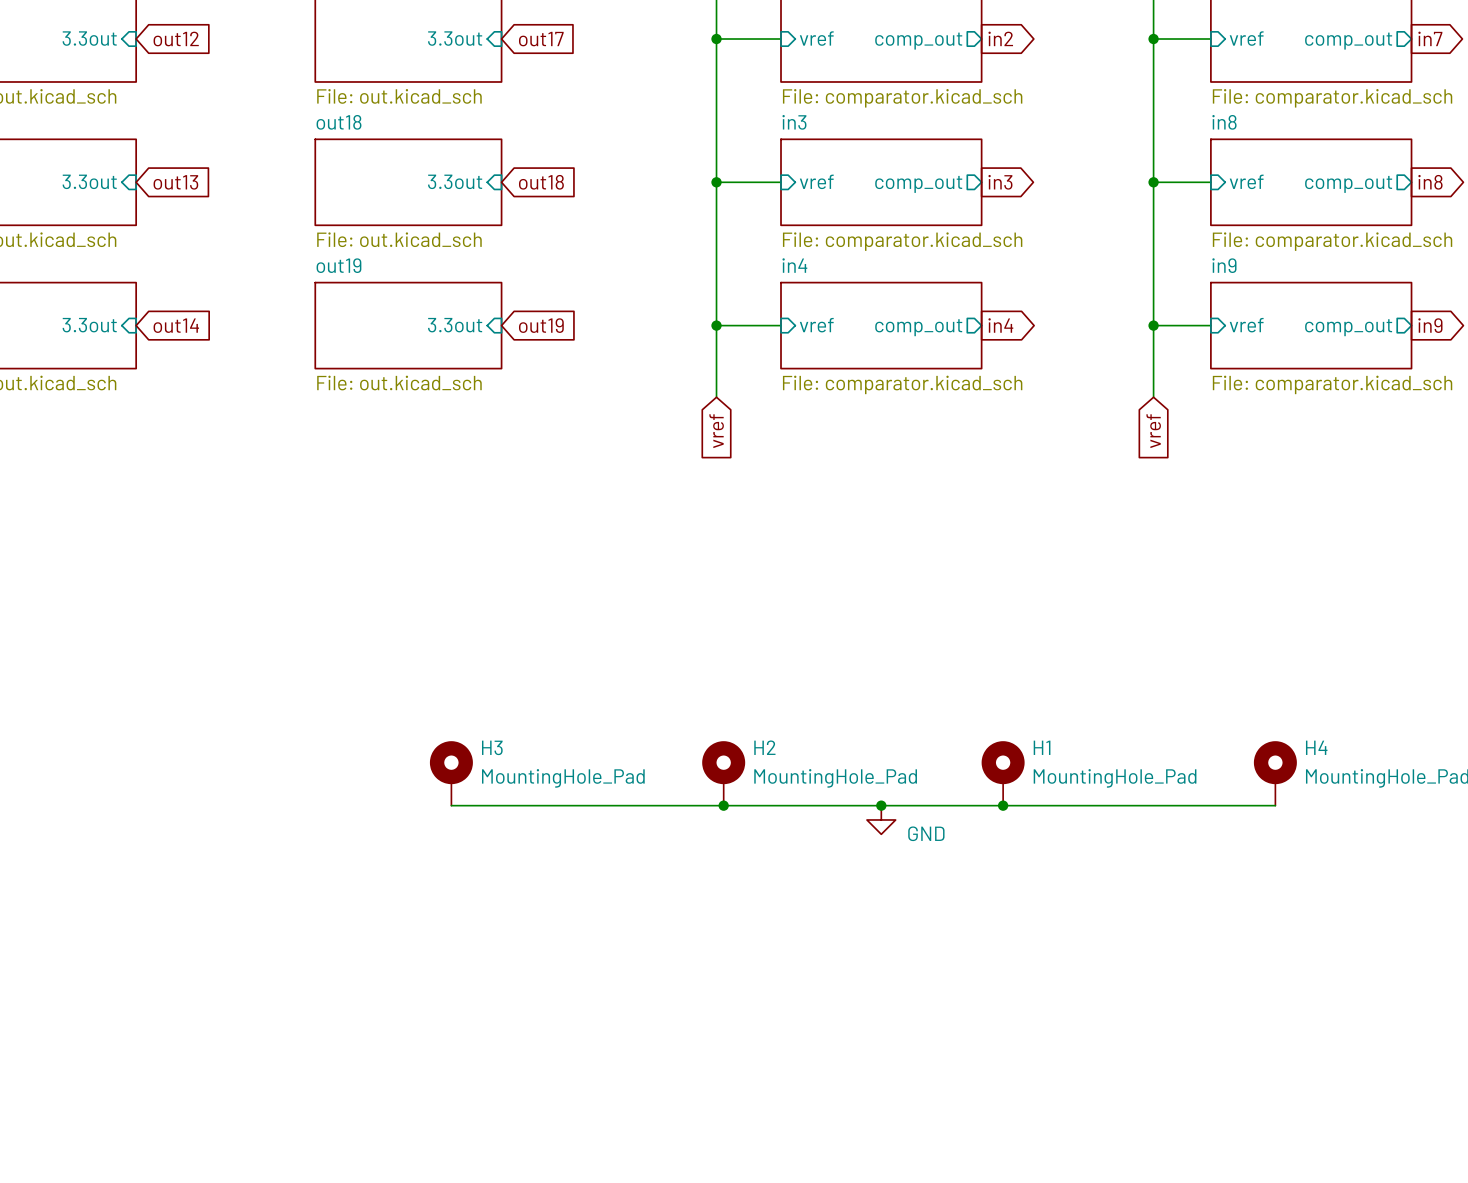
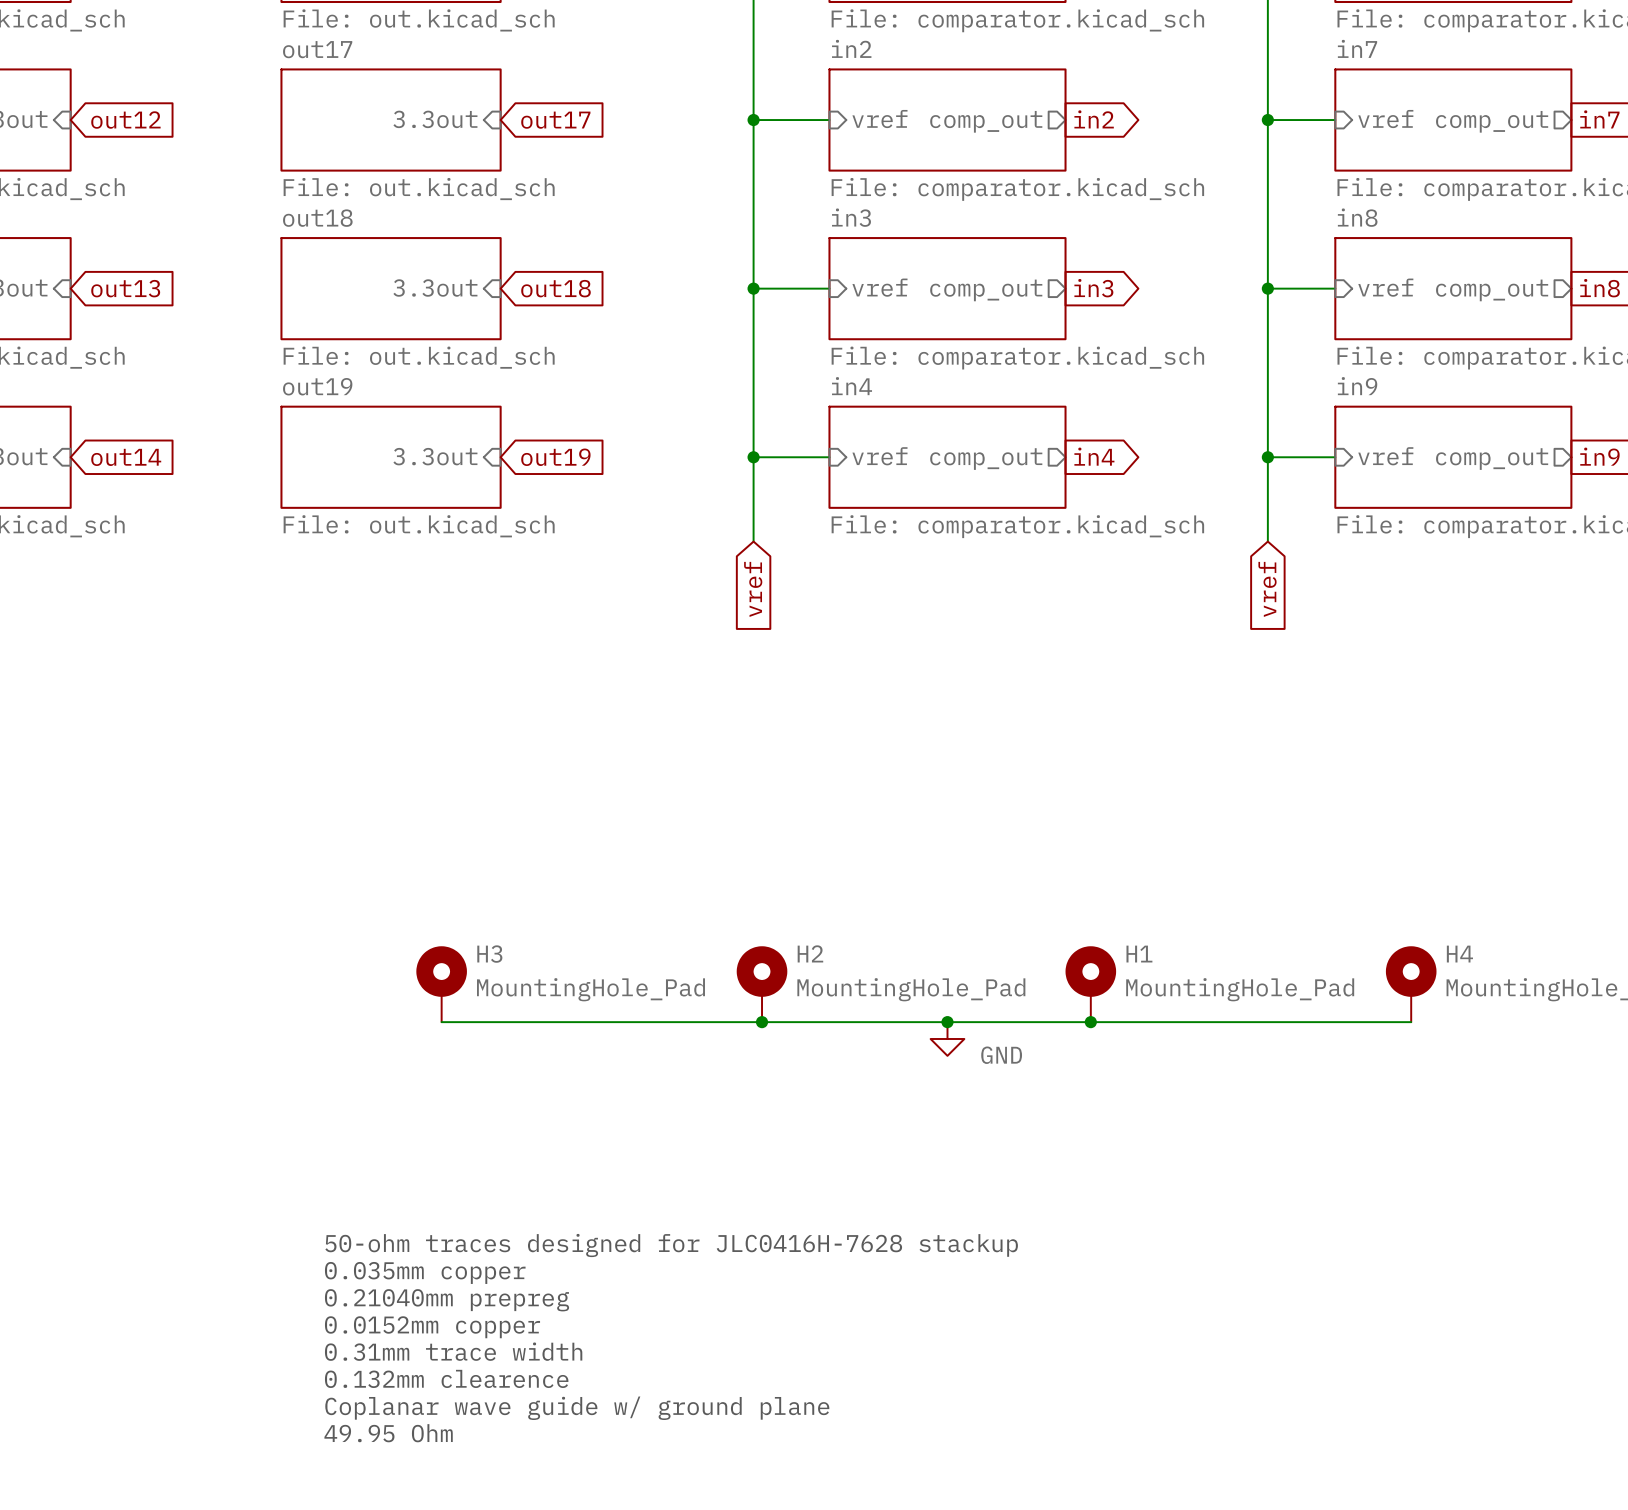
text: none -> 50-ohm traces designed for JLC0416H-7628 stackup (671, 1245)
text: none -> 0.035mm copper (425, 1272)
text: none -> 0.21040mm prepreg (447, 1300)
text: none -> 0.0152mm copper (432, 1327)
text: none -> 0.31mm trace width (453, 1351)
text: none -> 0.132mm clearence (446, 1378)
text: none -> Coplanar wave guide w/ ground plane (577, 1408)
text: none -> 49.95 Ohm (388, 1433)

